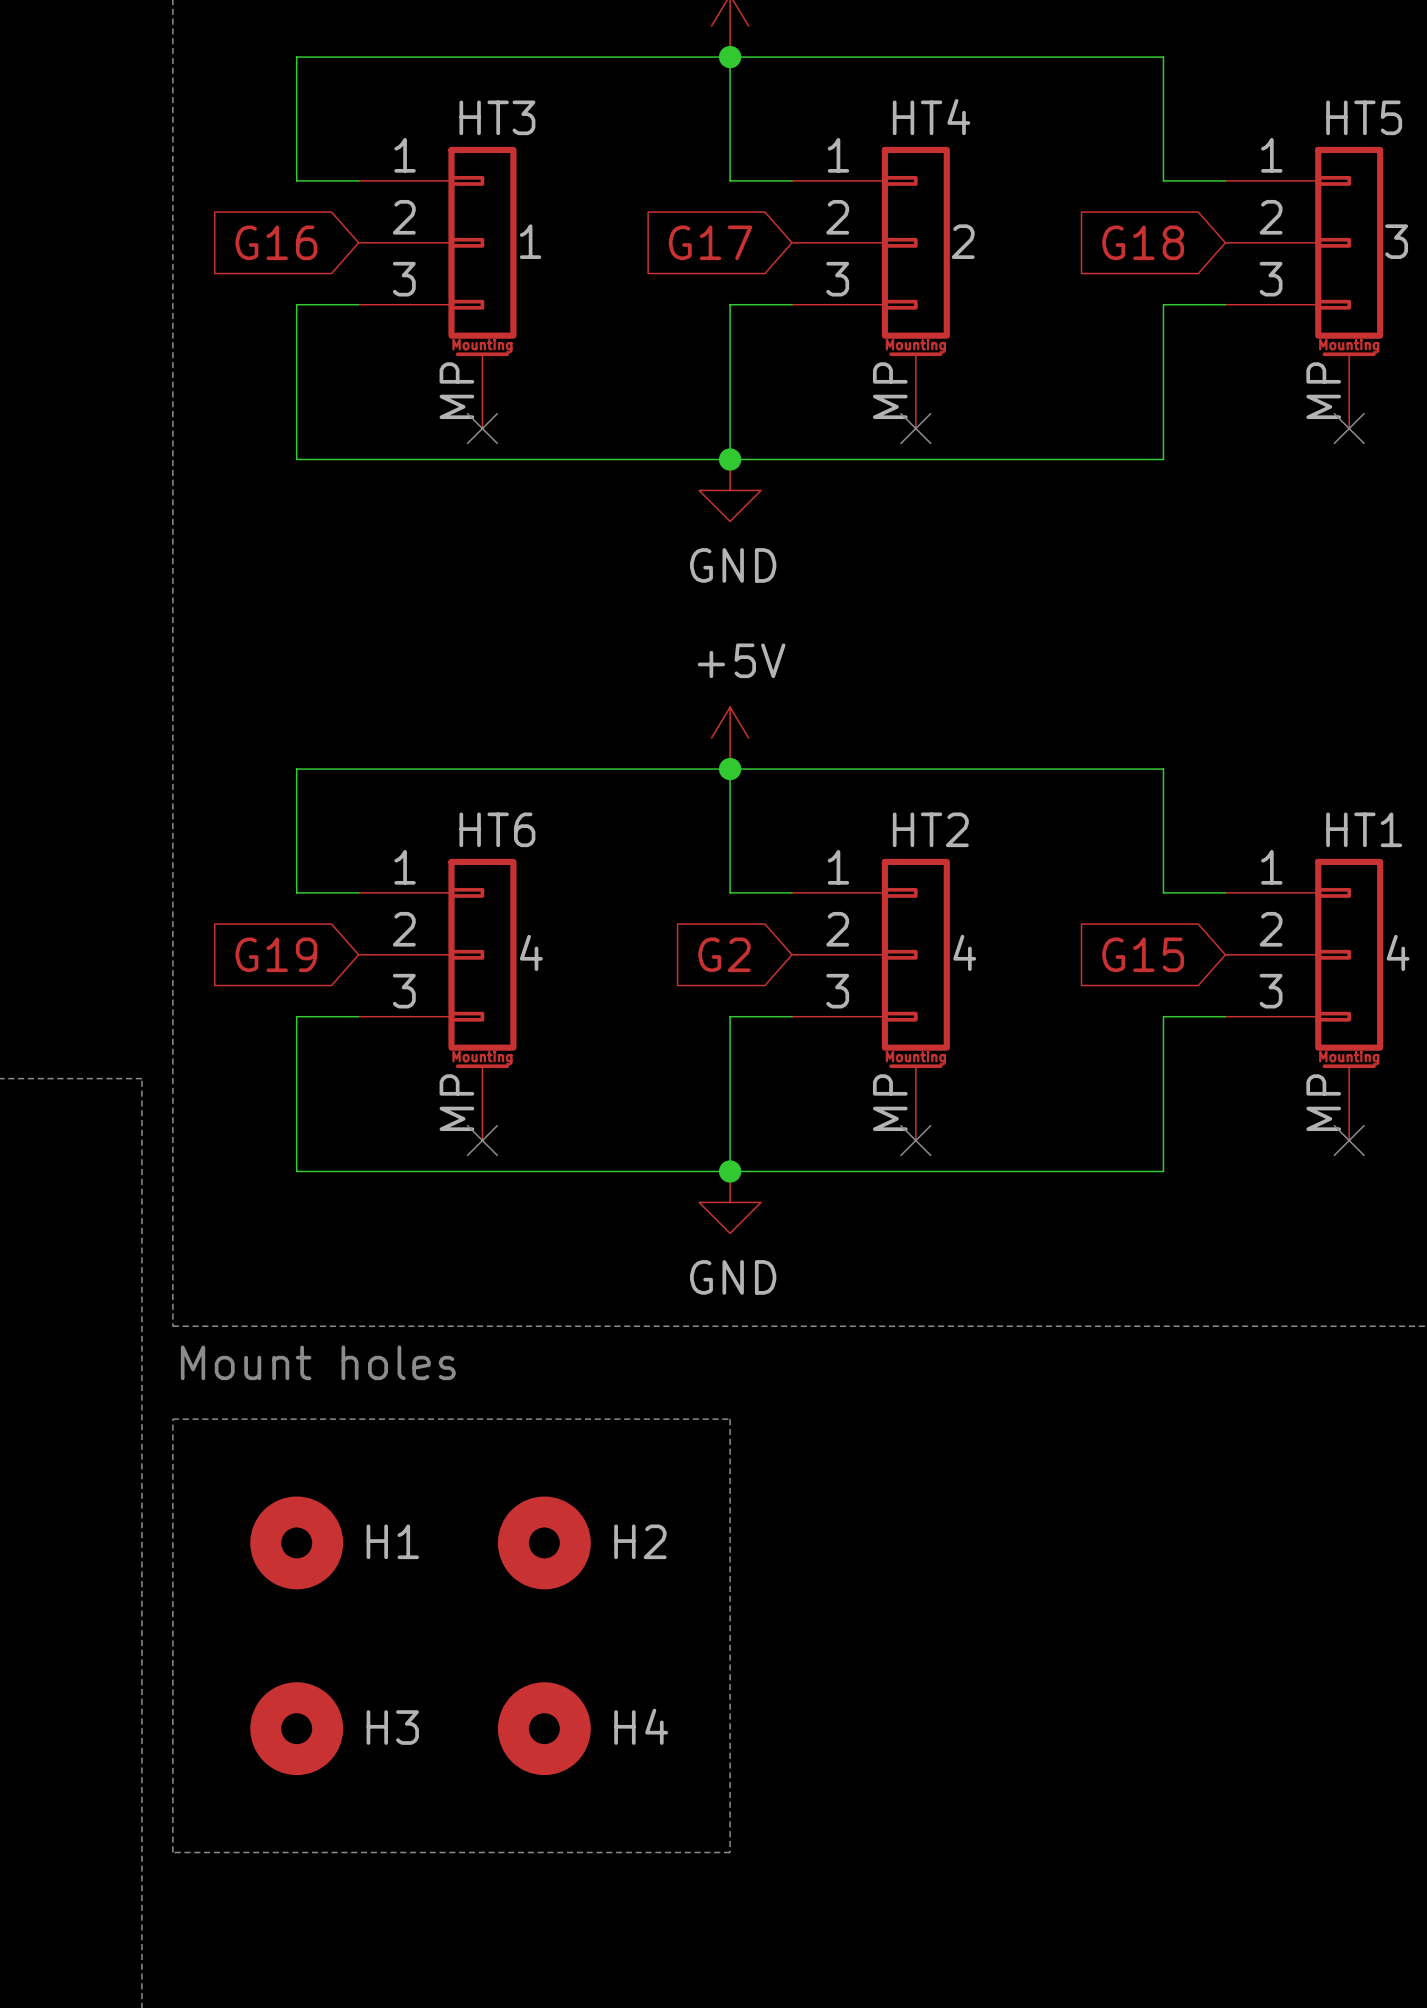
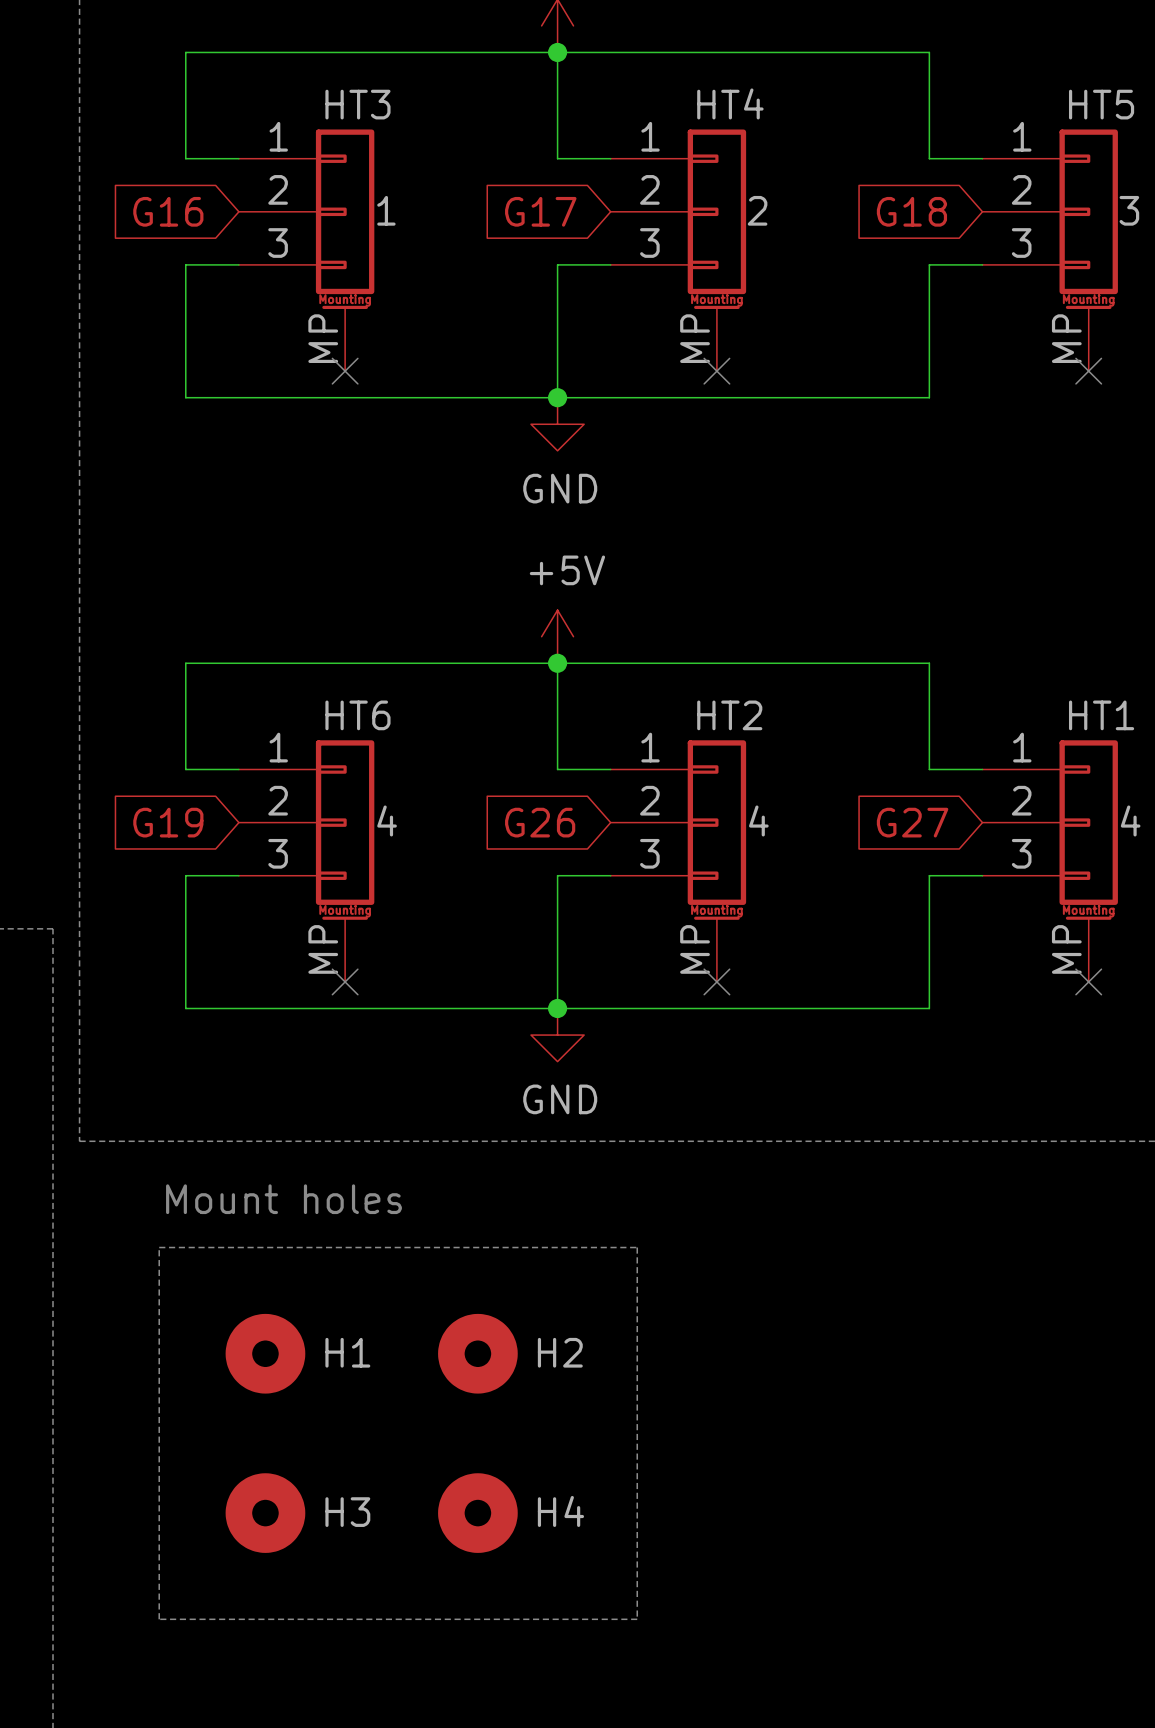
global label: G2 (724, 954) -> G26 (540, 822)
global label: G15 (1143, 954) -> G27 (912, 822)
text position: Mount holes (318, 1362) -> Mount holes (283, 1199)
line: (172, 1419) (730, 1419) (730, 1852) (172, 1852) (172, 1419) -> (159, 1247) (159, 1619) (637, 1619) (637, 1247) (159, 1247)
H1 position: (296, 1542) -> (265, 1353)
H2 position: (544, 1542) -> (477, 1353)
H3 position: (296, 1728) -> (265, 1513)
H4 position: (544, 1728) -> (477, 1513)

